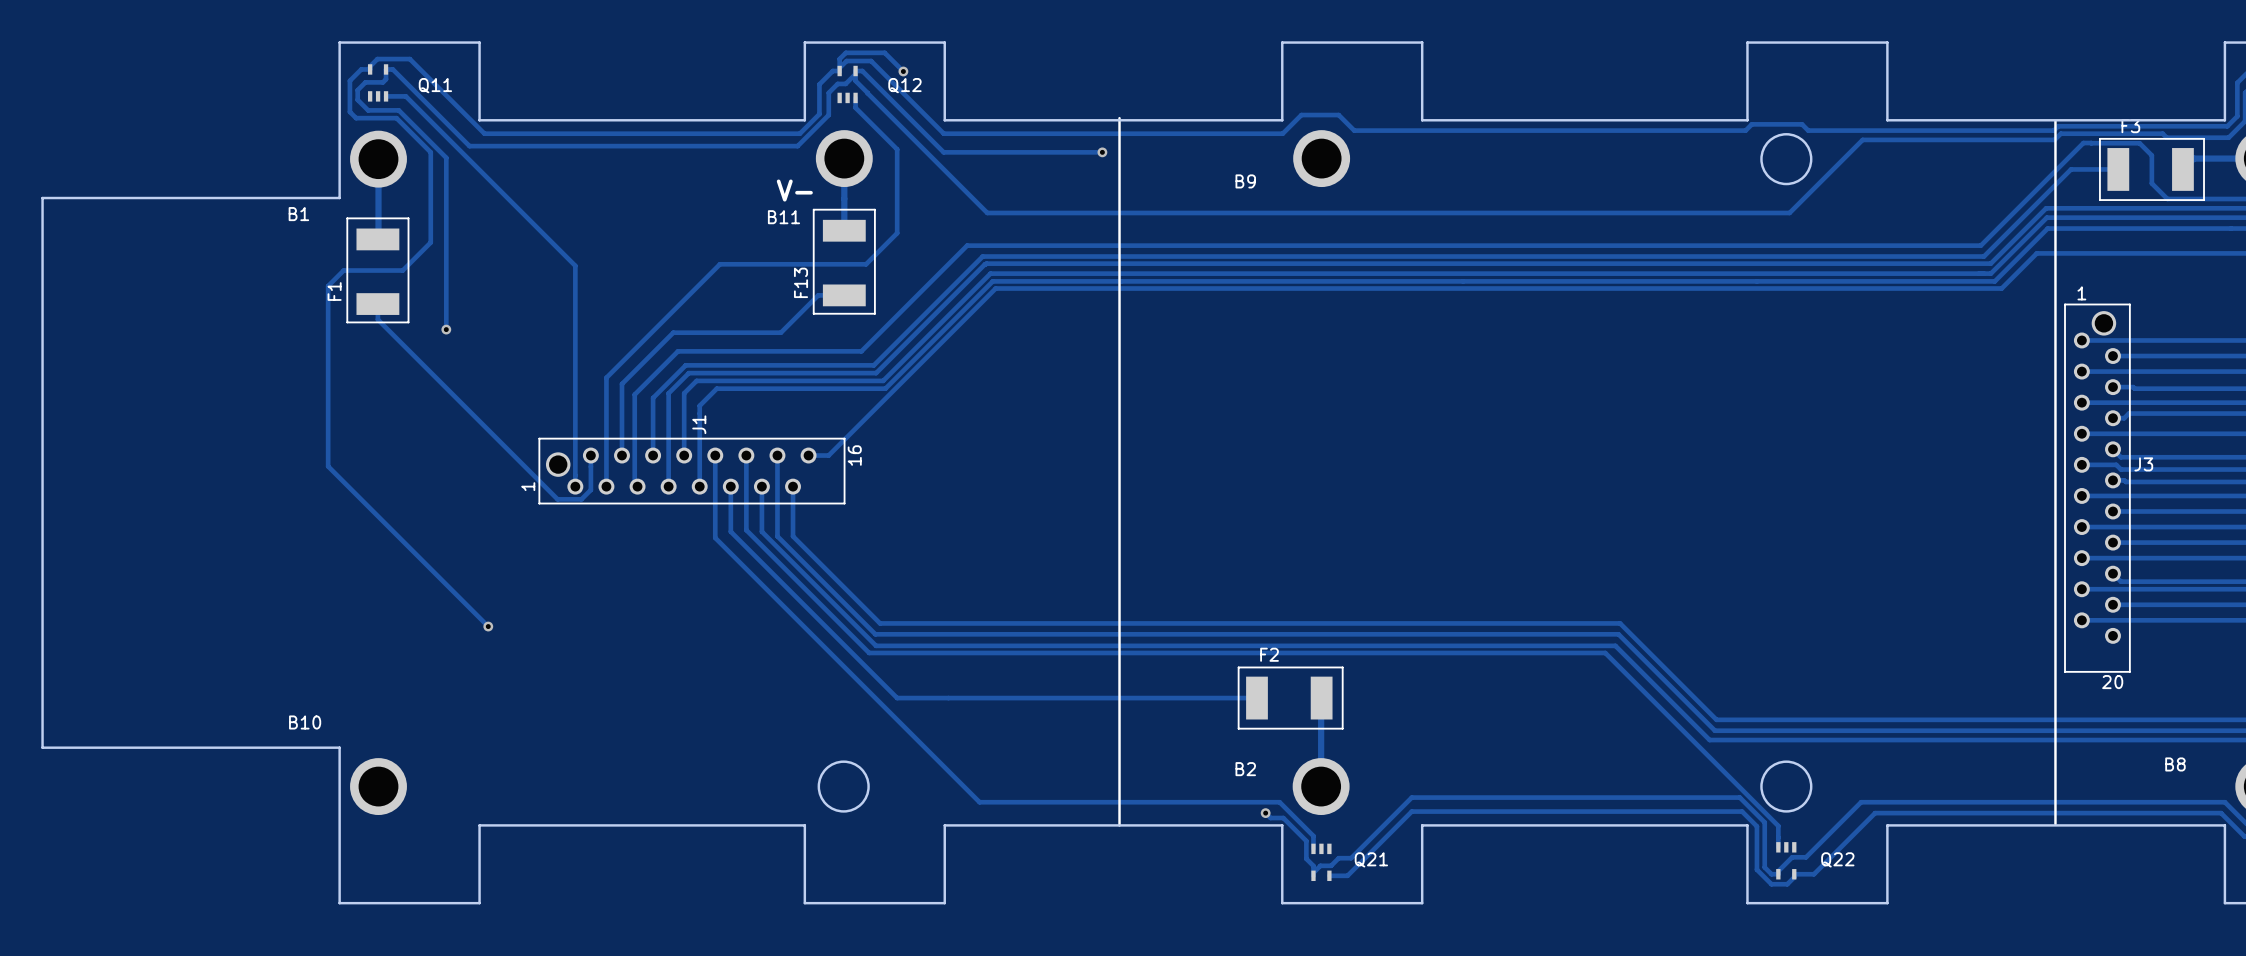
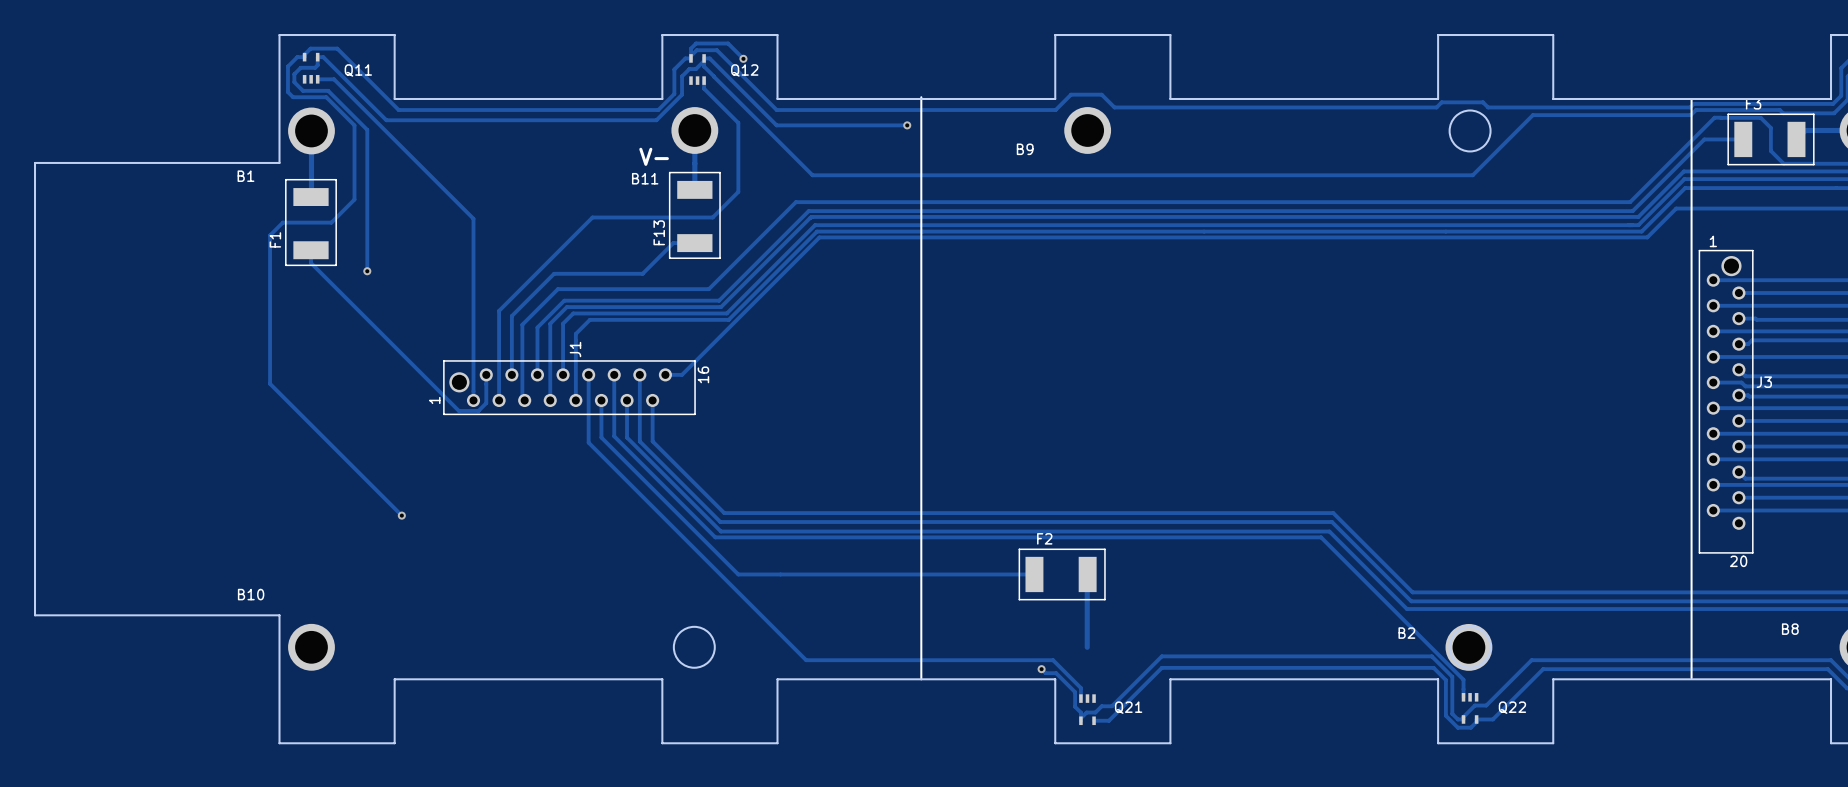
B2 position: (1321, 786) -> (1468, 647)

